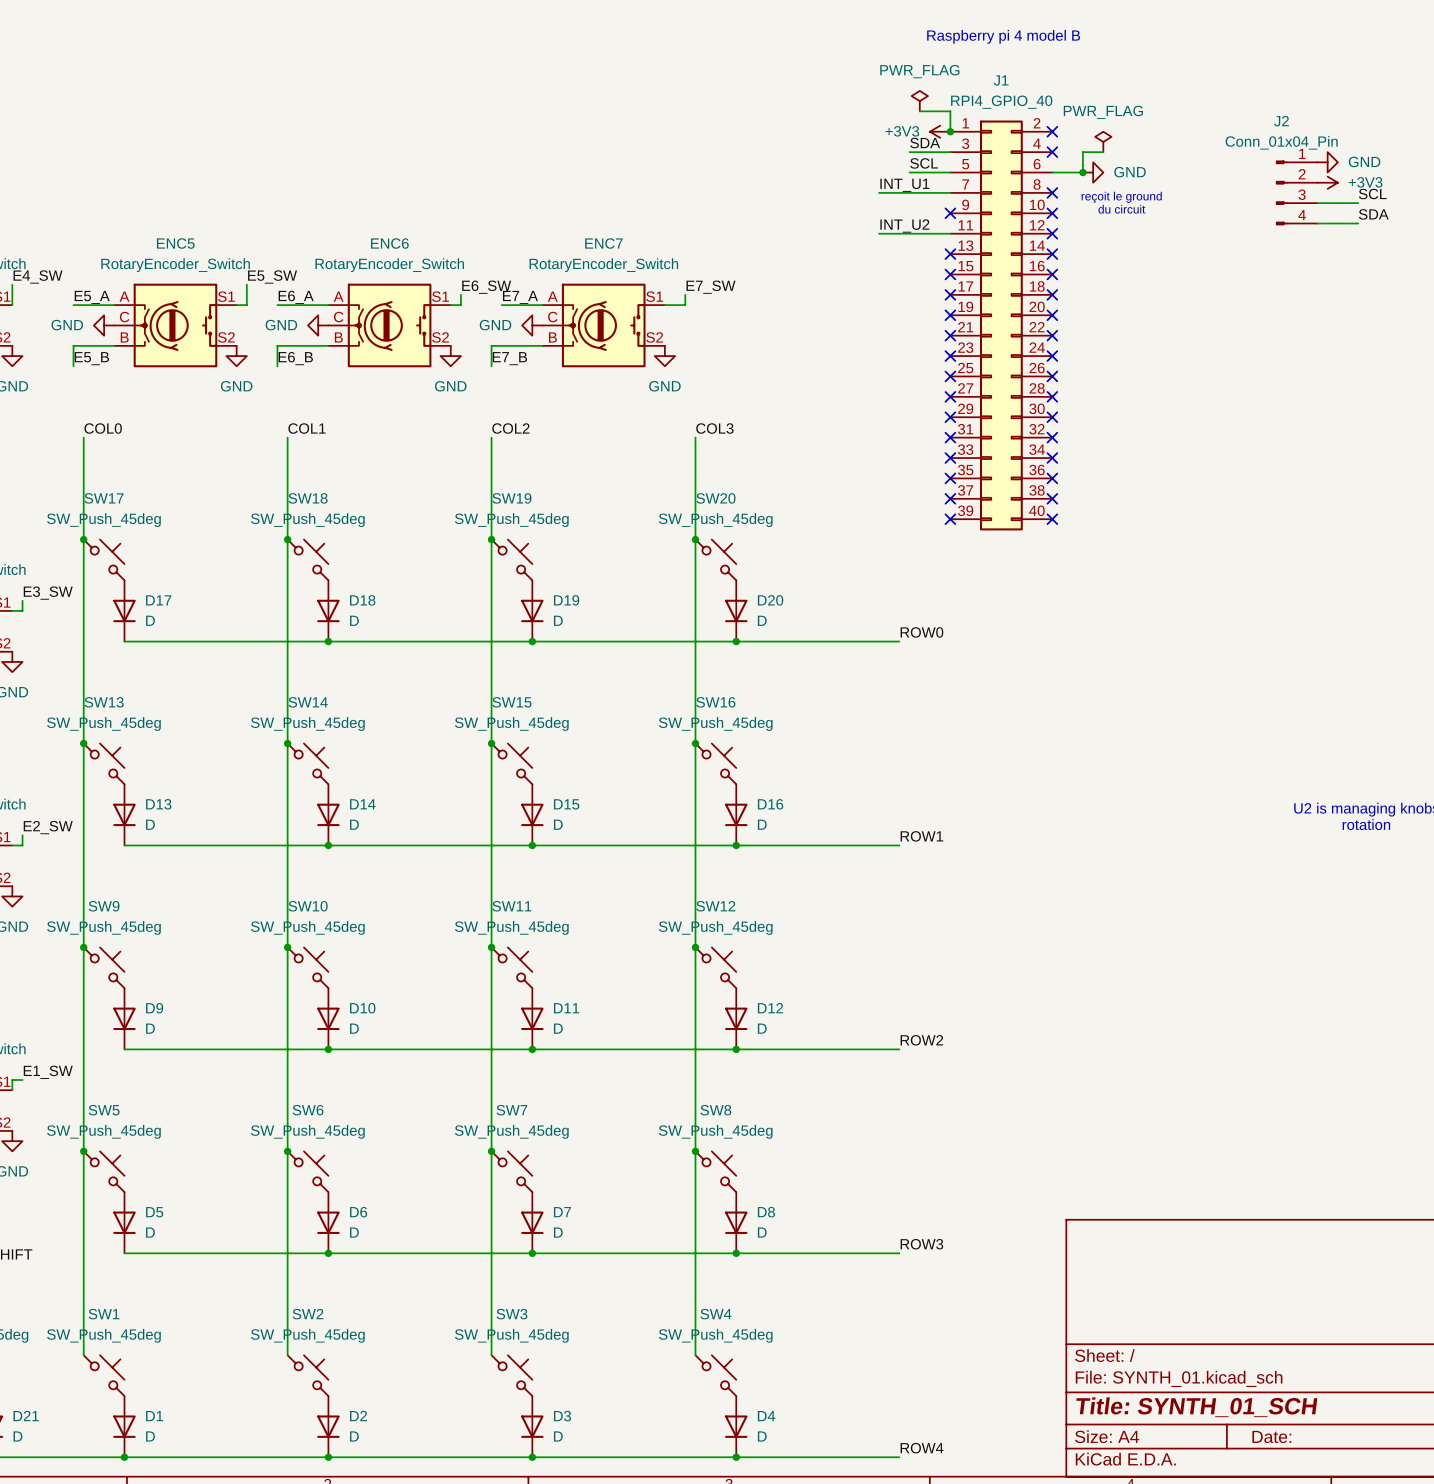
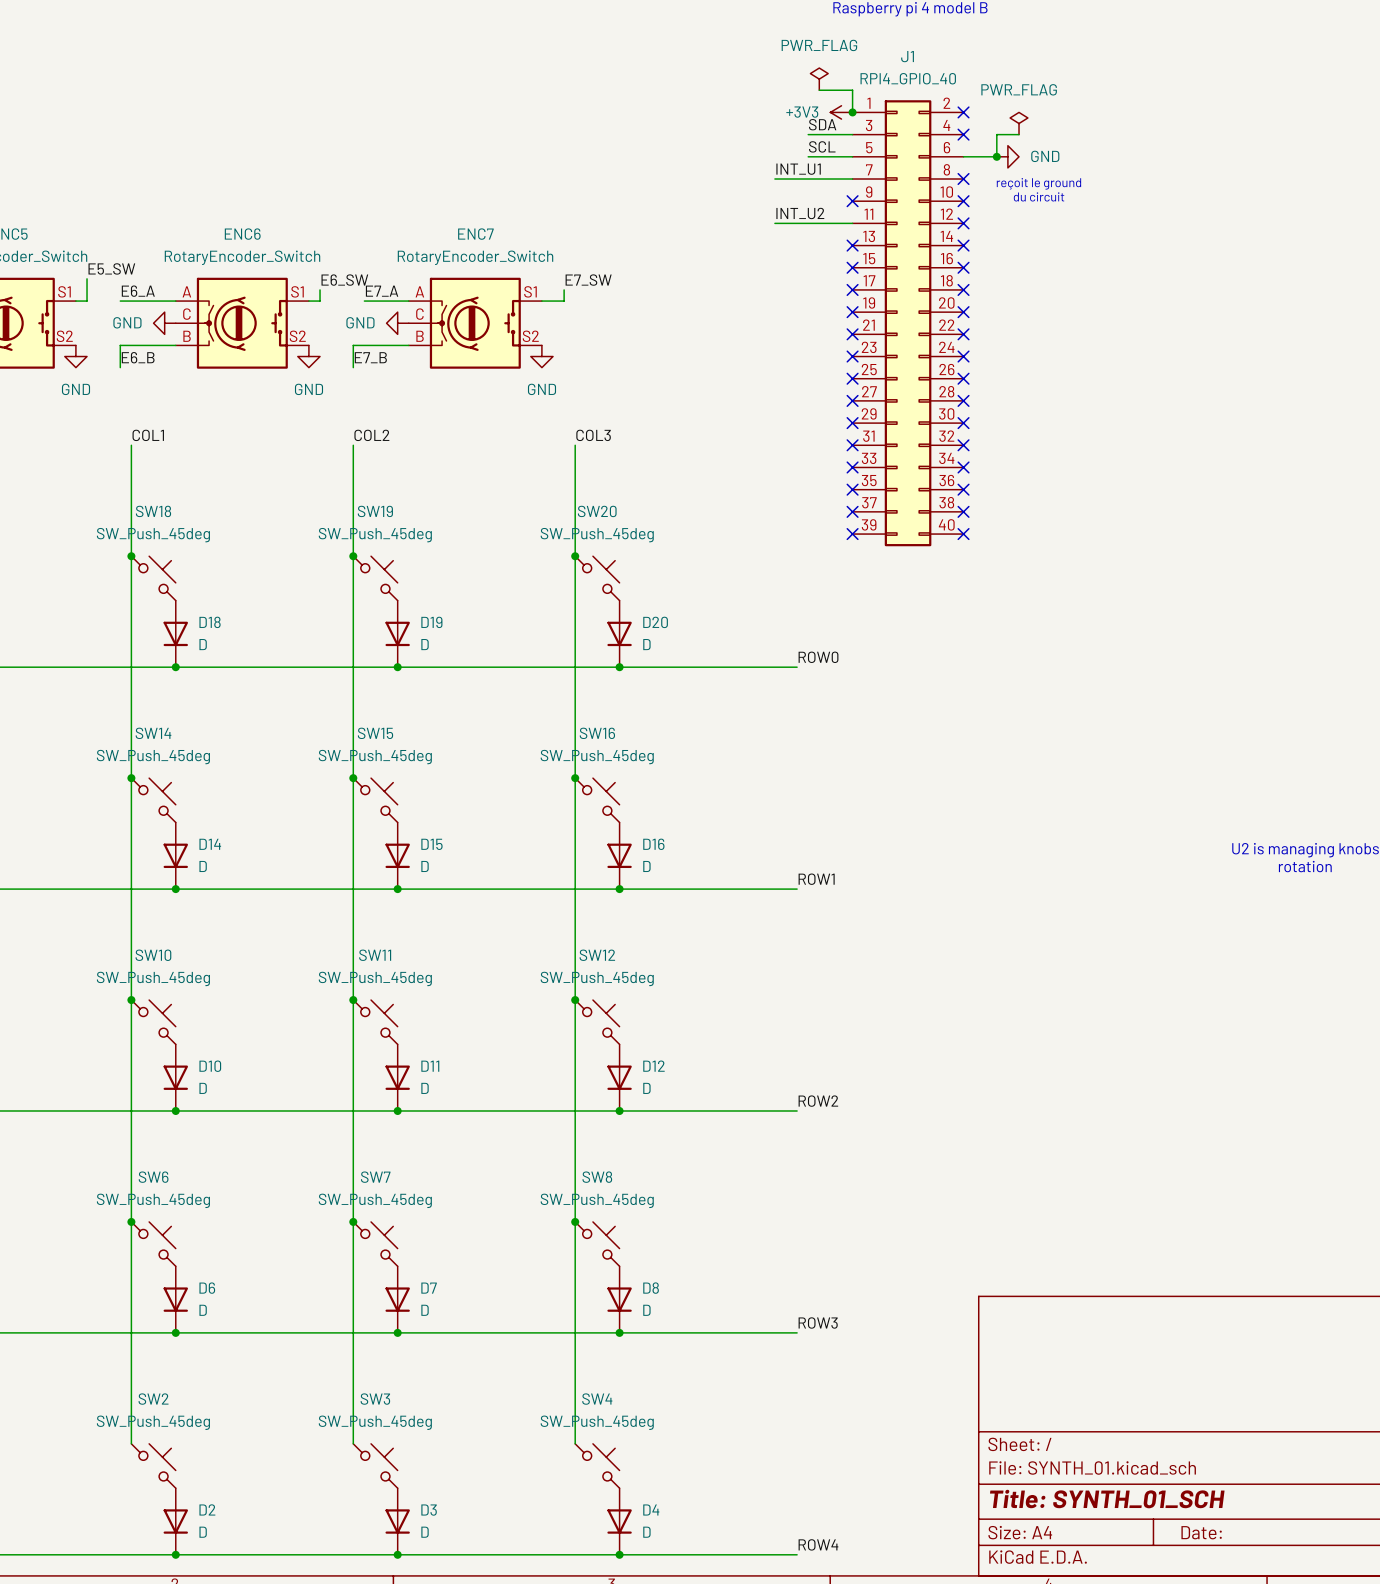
power symbol: GND (1327, 162) -> none
power symbol: +3V3 (1327, 182) -> none
J2: Conn_01x04_Pin (1296, 192) -> none
label: SCL (1372, 194) -> none
wire: (1317, 203) (1358, 203) -> none
label: SDA (1373, 214) -> none
wire: (1317, 223) (1358, 223) -> none

